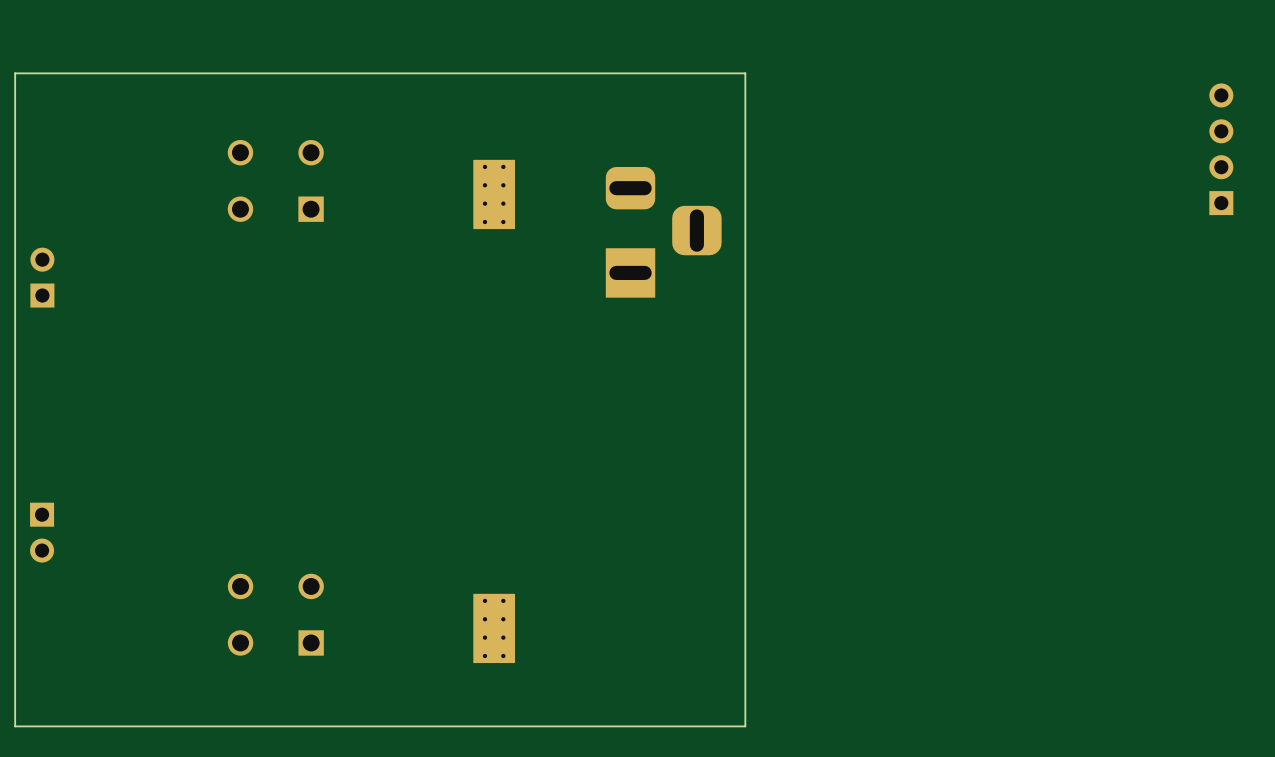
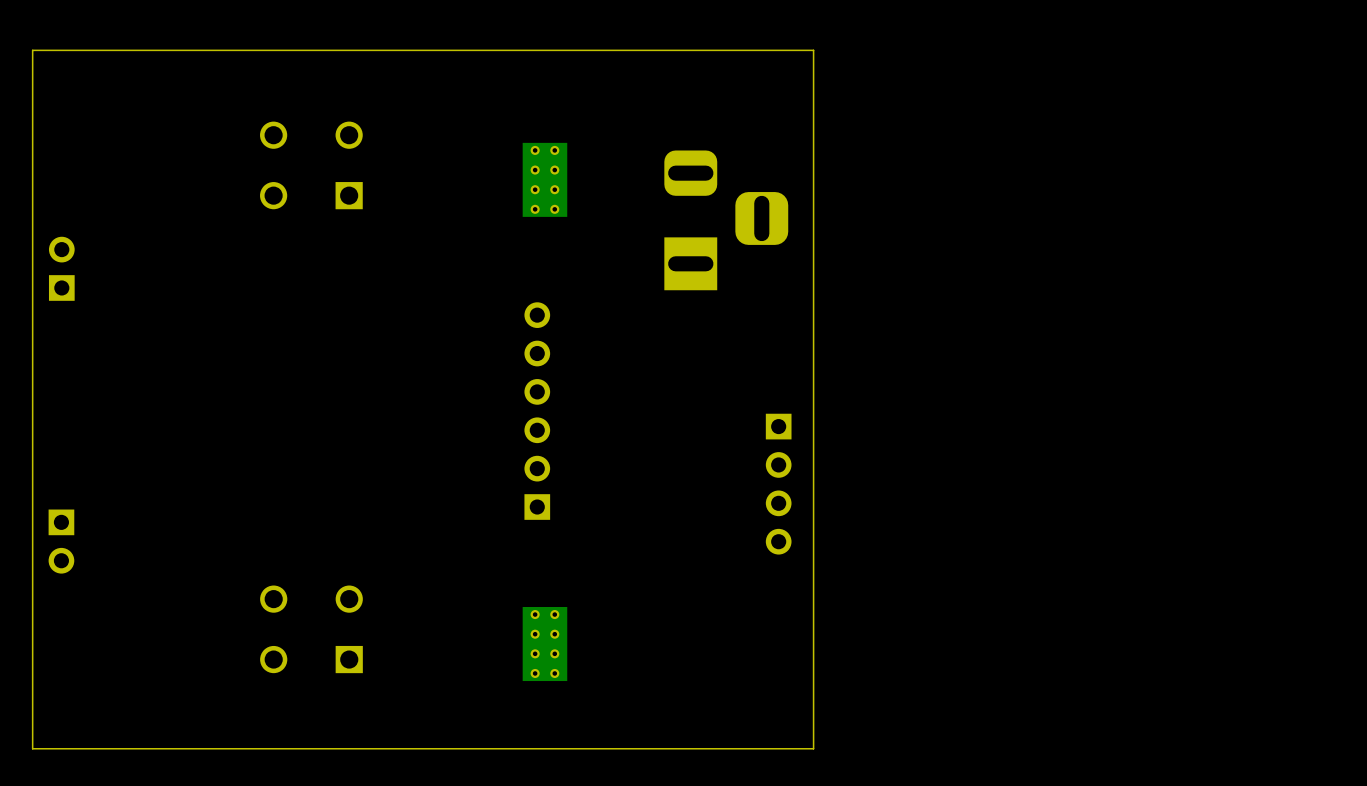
part: (1221, 149) -> none
part: none -> (537, 411)
part: none -> (778, 484)

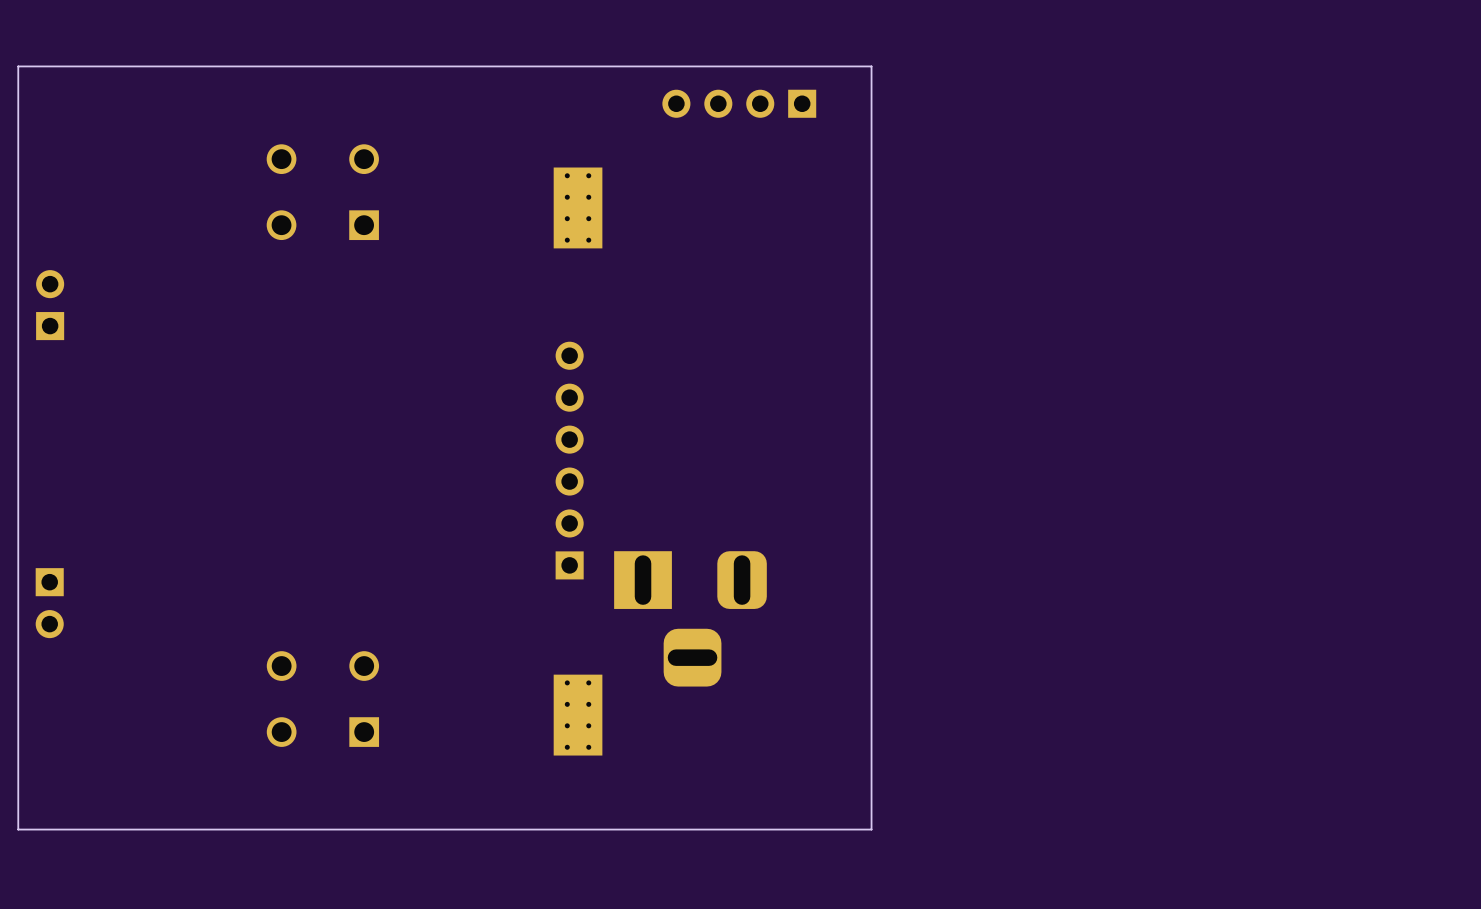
part: none -> (739, 103)
part rotation: 0° (726, 220) -> 90° clockwise (690, 618)
part position: (726, 220) -> (690, 618)
part: (778, 484) -> none

